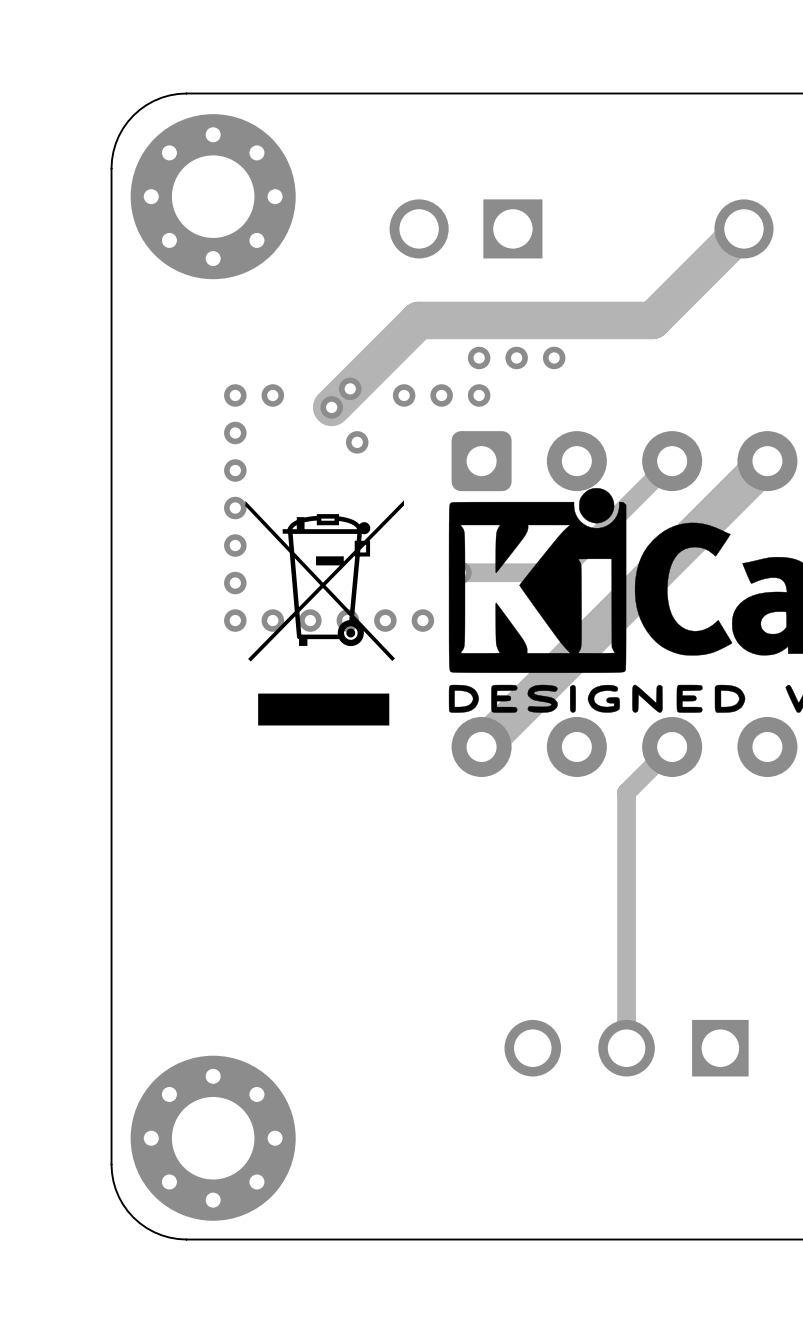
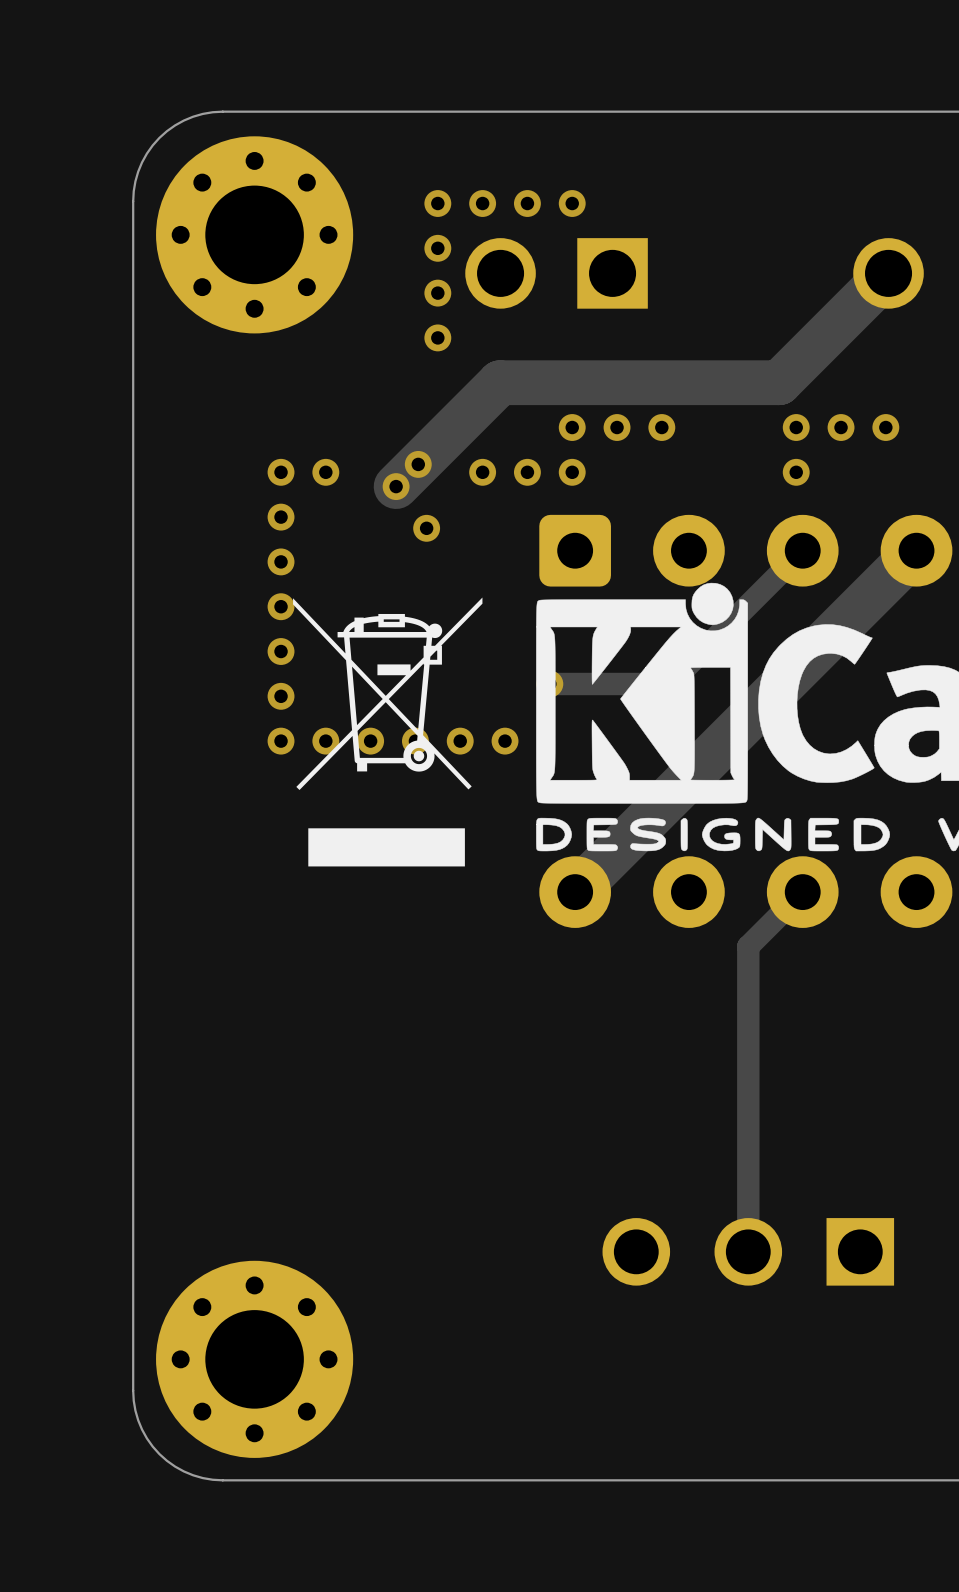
via: none -> (437, 203)
via: none -> (482, 203)
via: none -> (527, 203)
via: none -> (572, 203)
via: none -> (437, 248)
via: none -> (437, 293)
via: none -> (437, 337)
via: none -> (796, 427)
via: none -> (841, 427)
via: none -> (885, 427)
via: none -> (796, 472)

